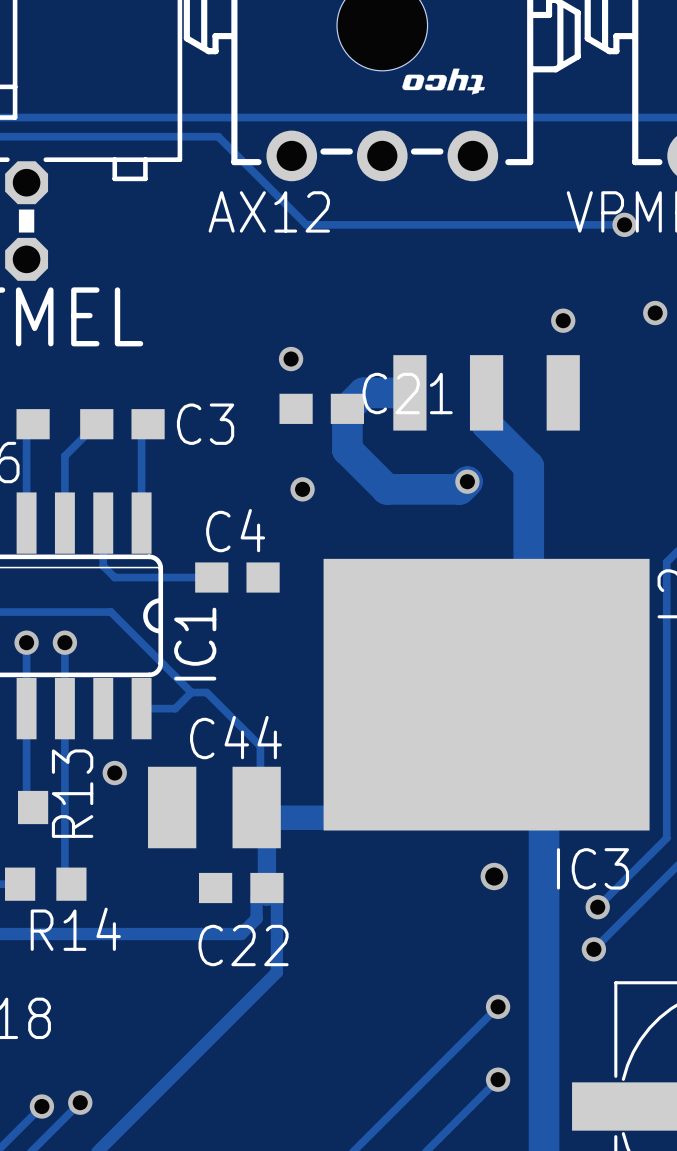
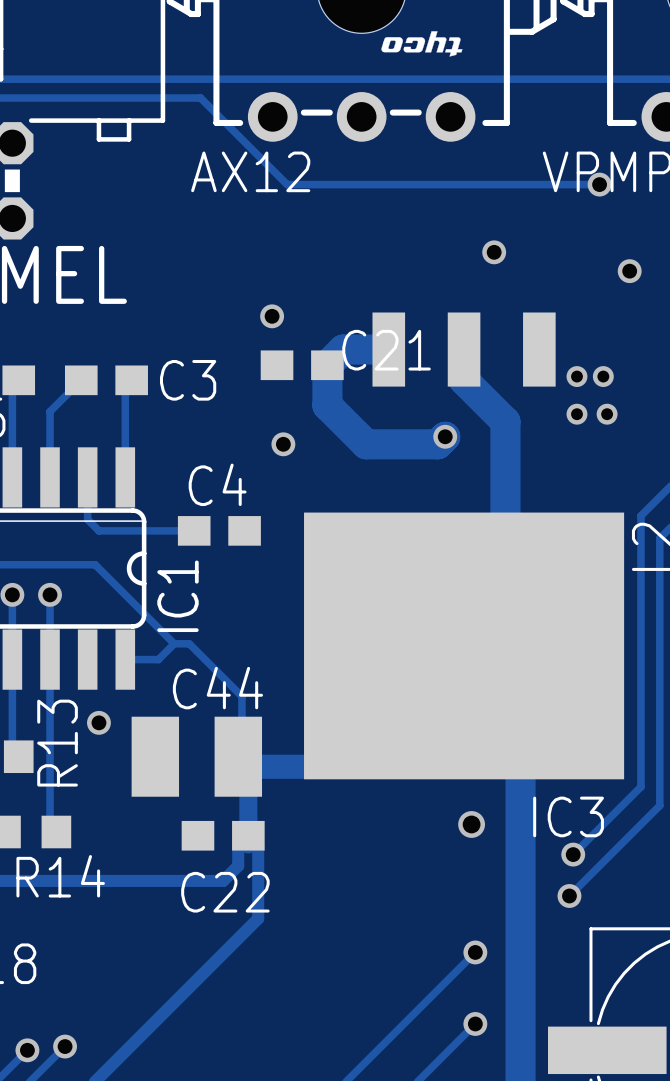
via position: (563, 320) -> (494, 252)
via: none -> (576, 376)
via: none -> (603, 376)
via: none -> (576, 414)
via: none -> (607, 414)

